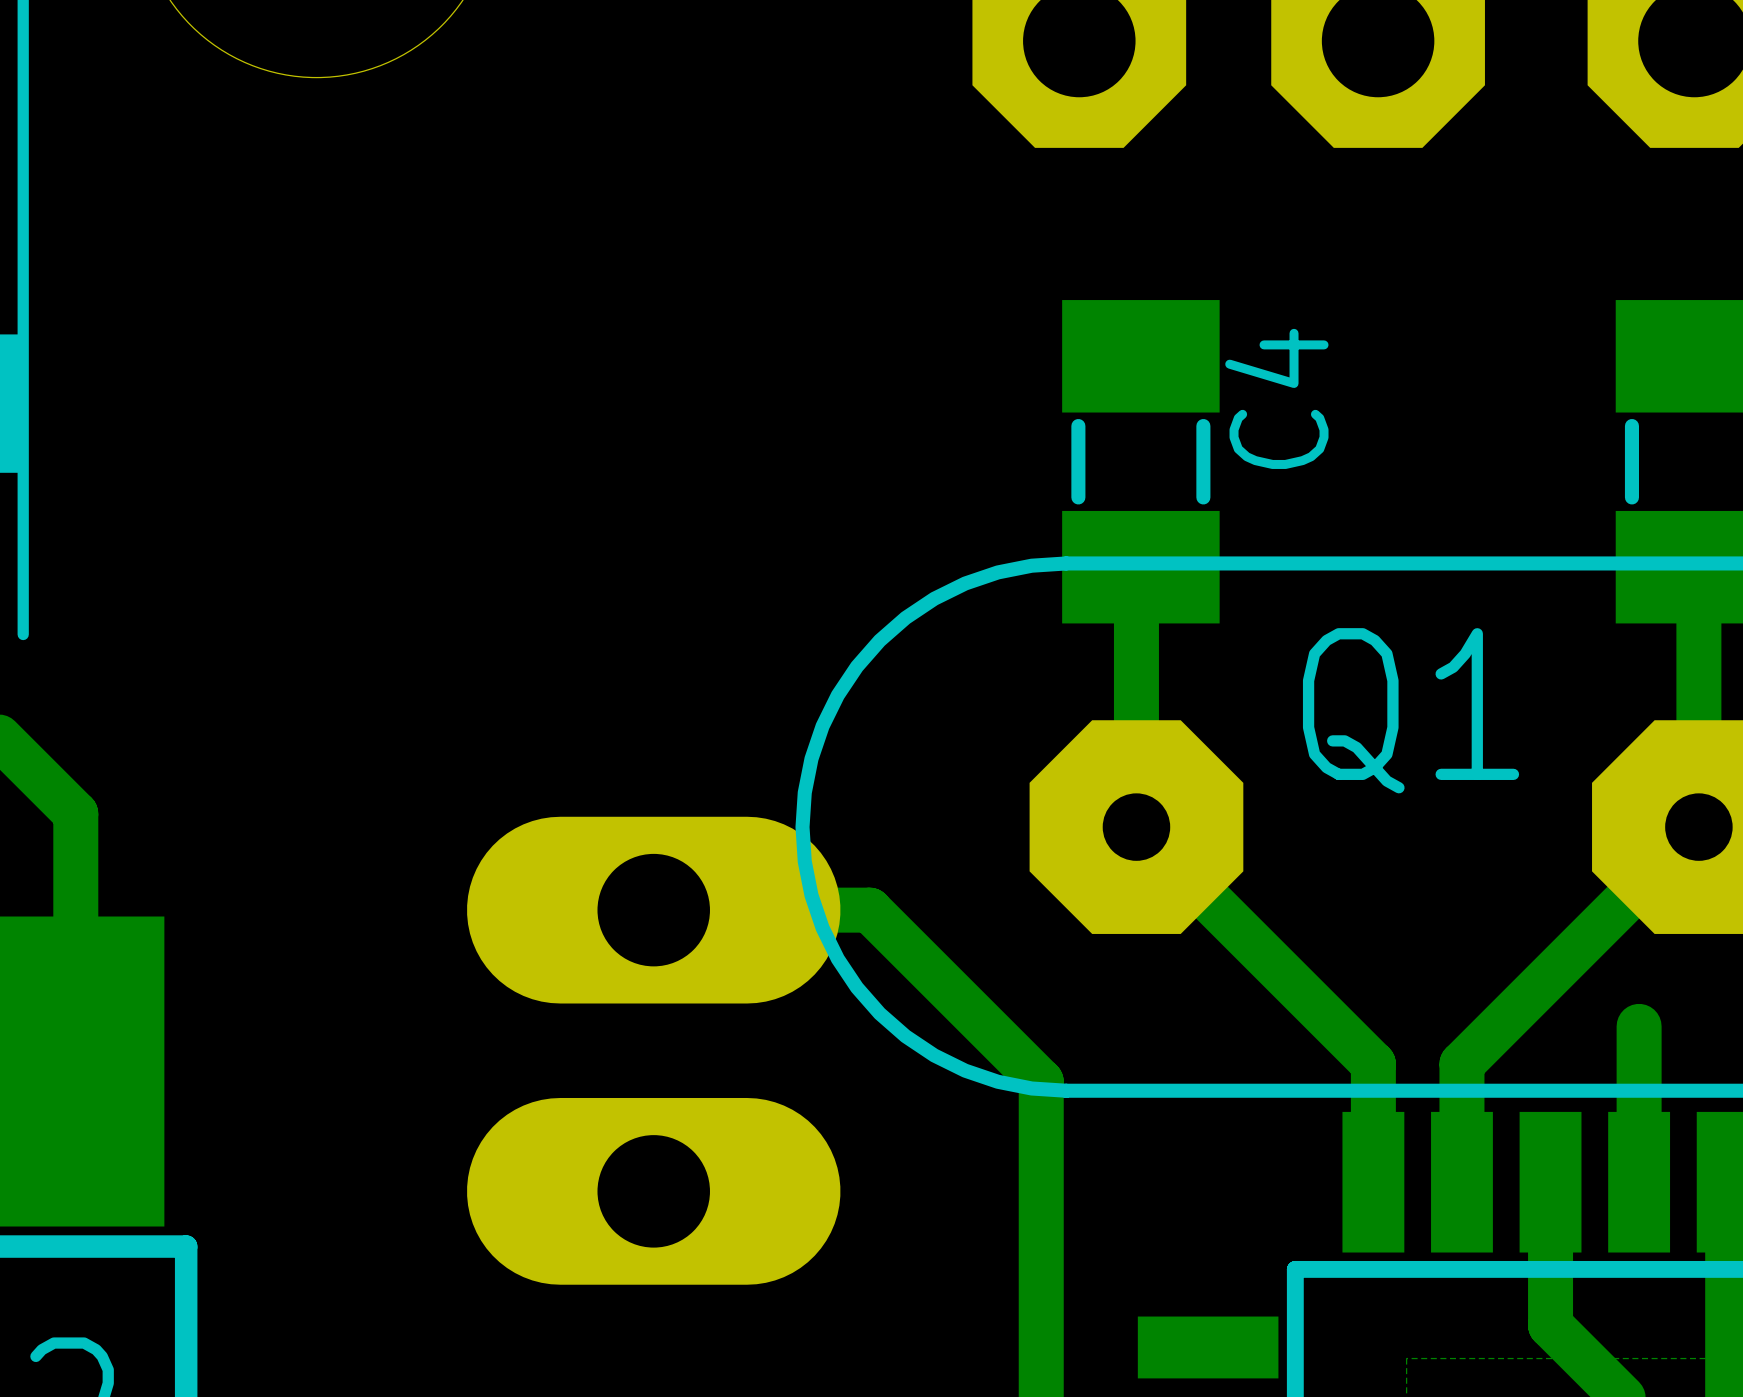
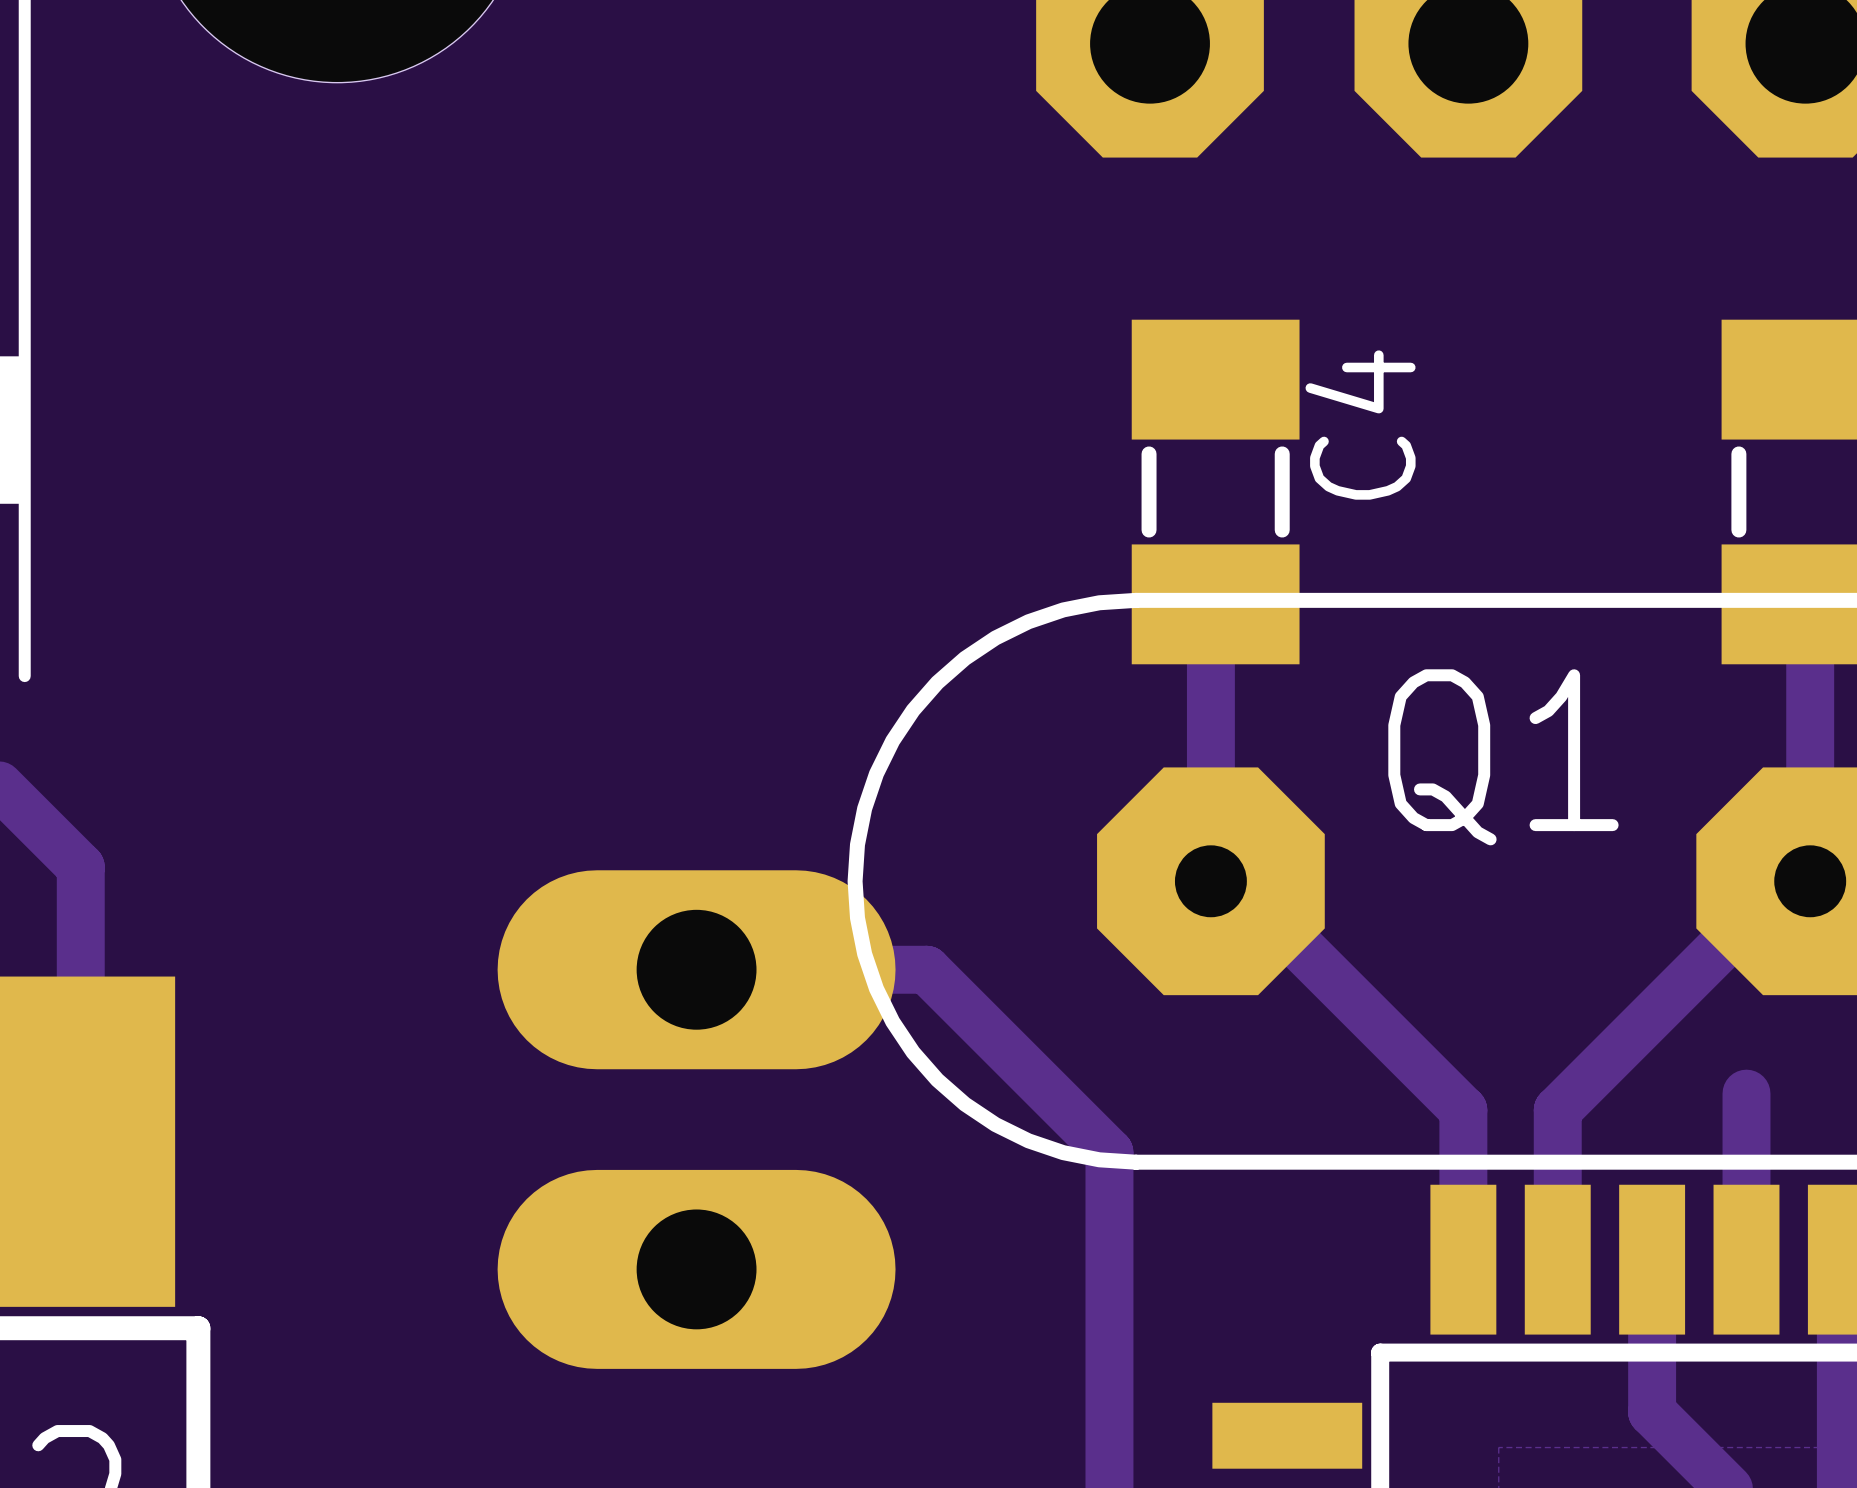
track: (1136, 804) (1136, 827) (1373, 1064) -> (1210, 857) (1463, 1110) (1463, 1133)
track: (1698, 804) (1698, 827) (1461, 1064) -> (1810, 857) (1557, 1110) (1557, 1133)

